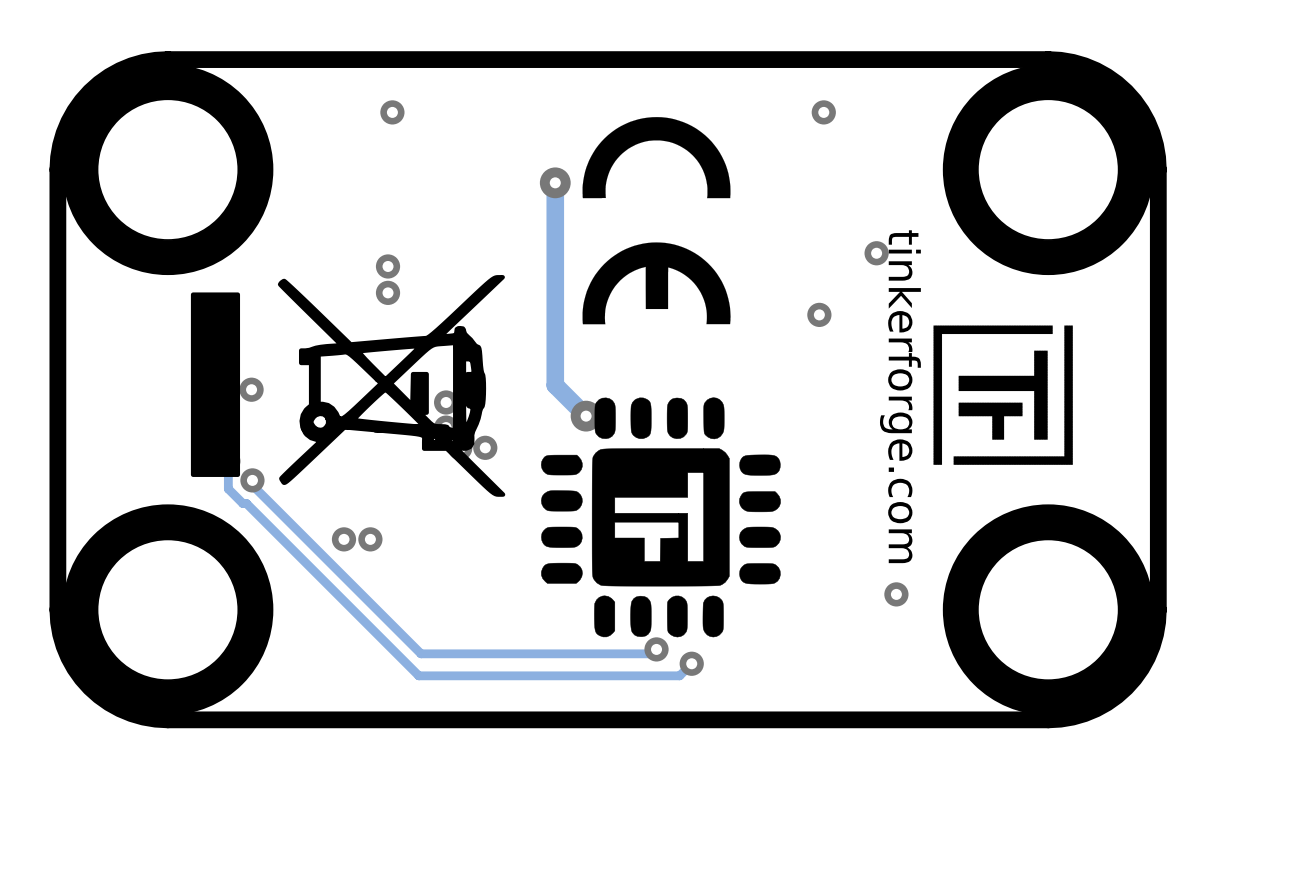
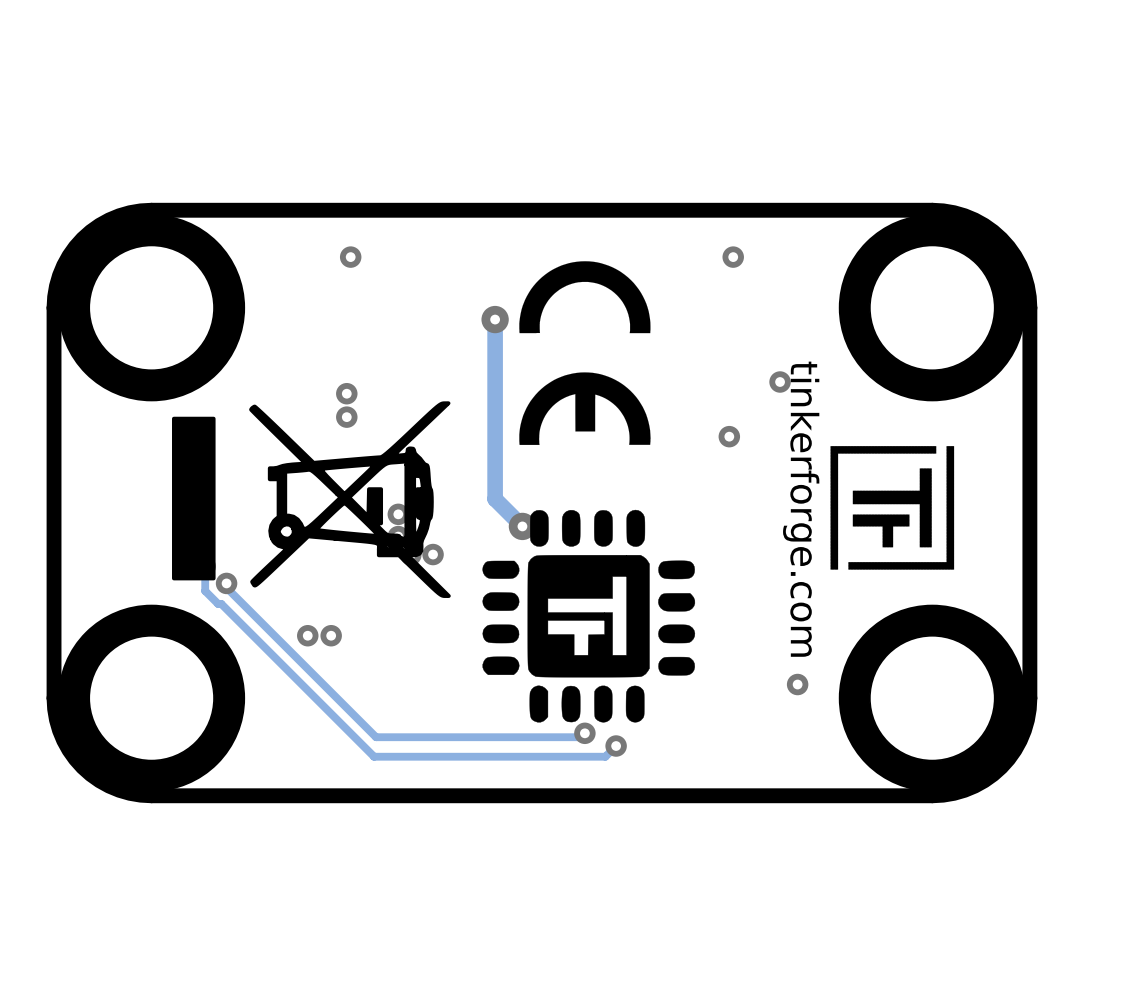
via: (251, 389) -> none

